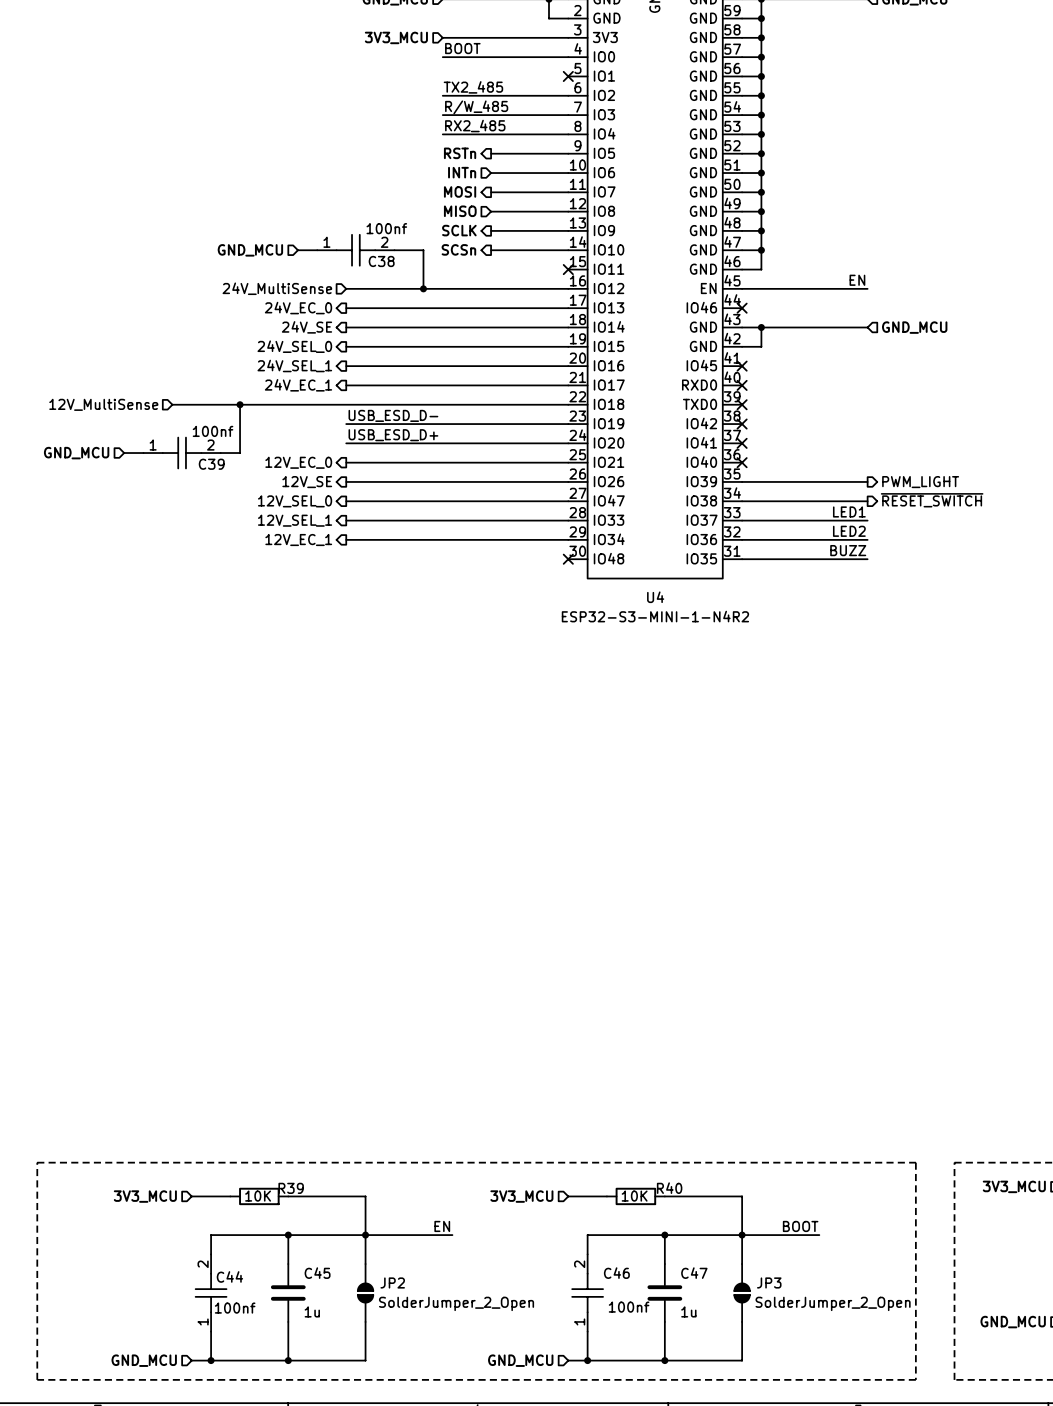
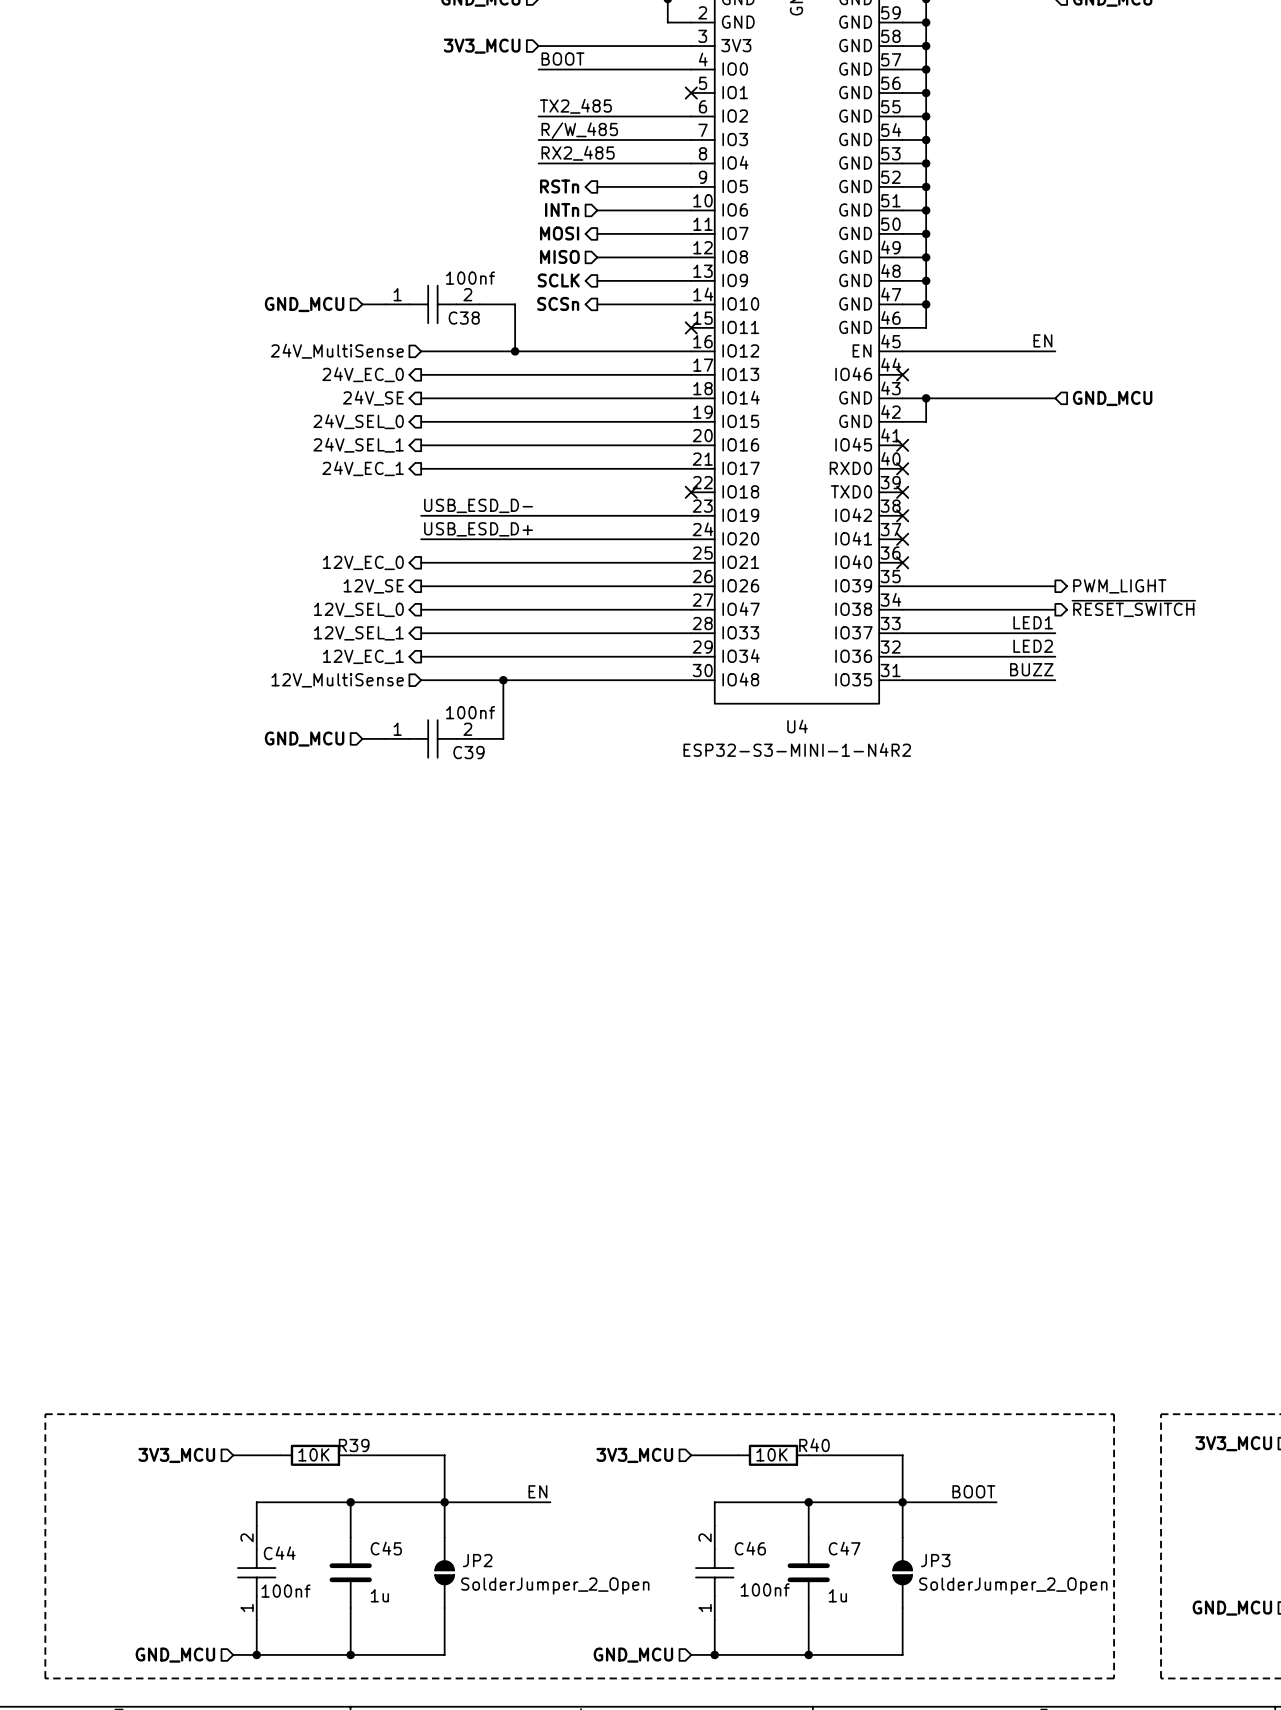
hierarchical label: 12V_MultiSense (103, 404) -> none
wire: (172, 404) (568, 404) -> none
wire: (240, 404) (240, 453) (220, 453) -> none
junction: (240, 404) -> none
no-connect mark: none -> (691, 492)
hierarchical label: GND_MCU (76, 453) -> none
wire: (124, 453) (143, 453) -> none
C39 position: (182, 453) -> (432, 738)
hierarchical label: none -> 12V_MultiSense (337, 680)
wire: none -> (421, 680) (691, 680)
wire: none -> (503, 680) (503, 738) (479, 738)
junction: none -> (503, 680)
no-connect mark: (568, 559) -> none
hierarchical label: none -> GND_MCU (304, 739)
wire: none -> (362, 738) (385, 738)

